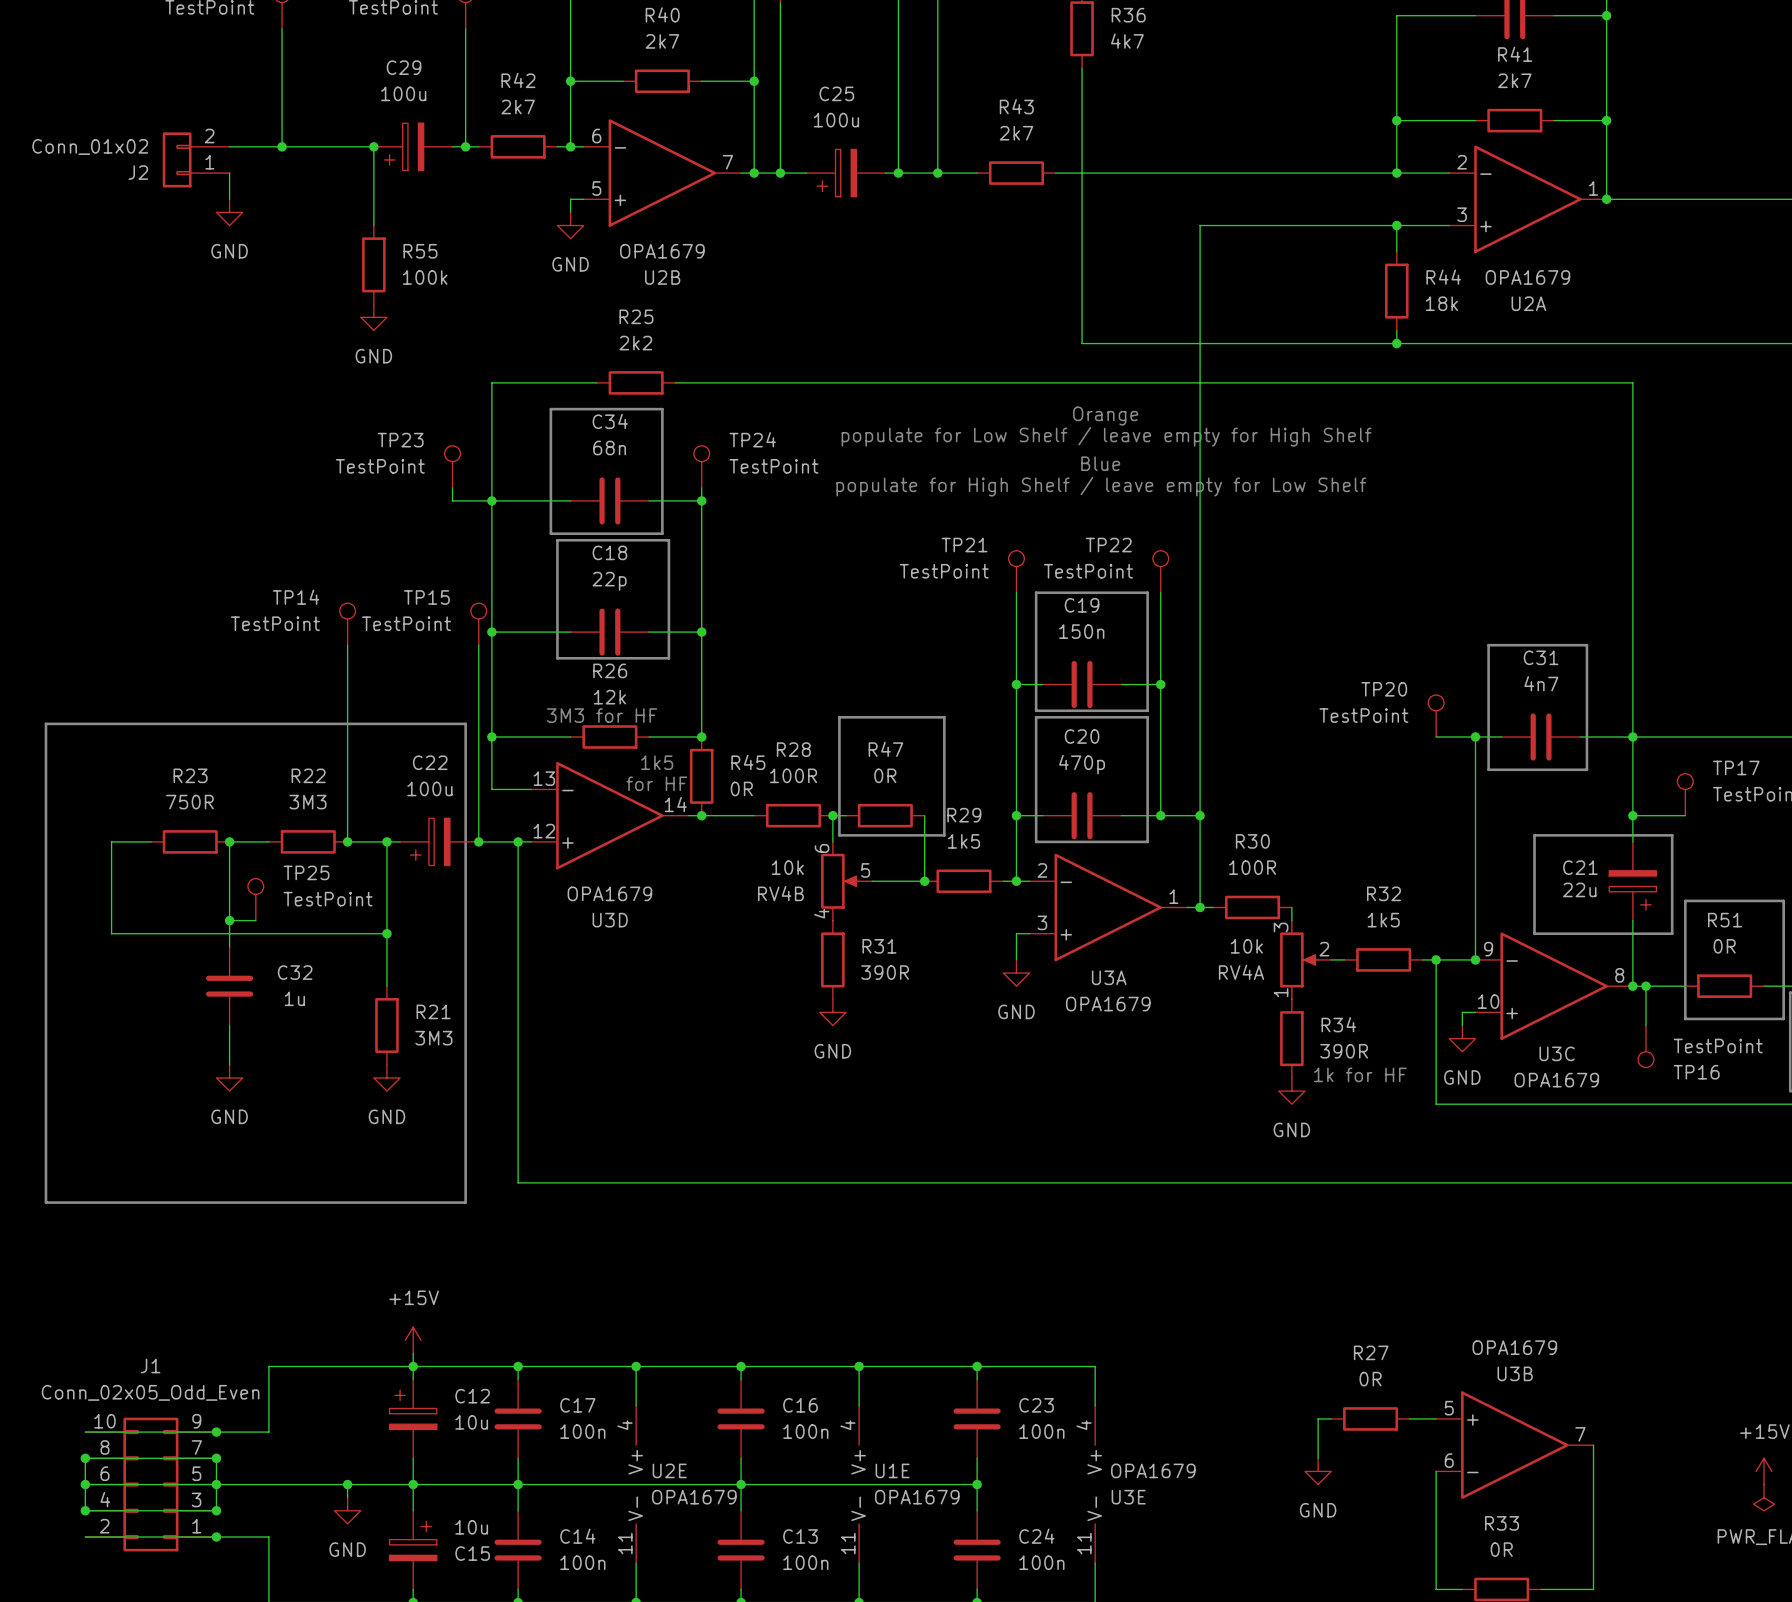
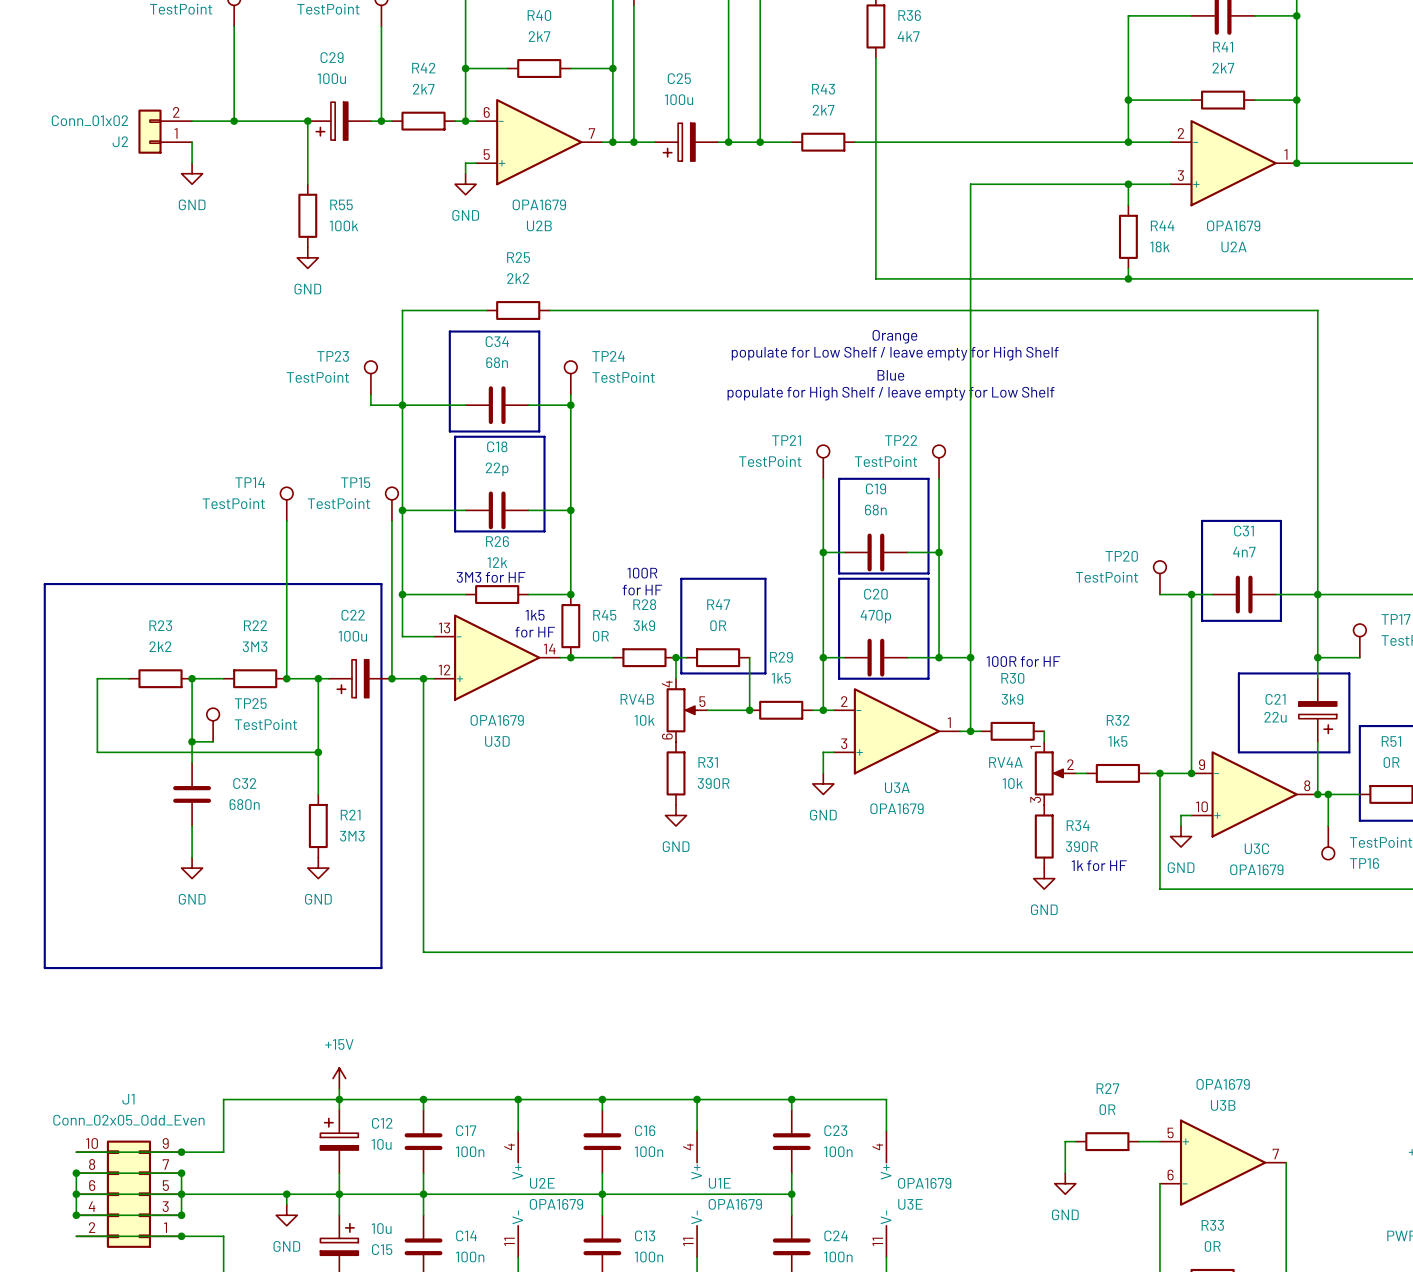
C19 value: 150n (1081, 631) -> 68n (875, 509)
text: none -> 100R (642, 573)
text: none -> for HF (642, 590)
R28 value: 100R (793, 775) -> 3k9 (644, 625)
R23 value: 750R (189, 802) -> 2k2 (160, 646)
text: none -> 100R for HF (1023, 661)
R30 value: 100R (1252, 867) -> 3k9 (1012, 699)
RV4B flip: as is (840, 881) -> up-down (681, 710)
RV4A flip: as is (1299, 959) -> up-down (1050, 773)
C32 value: 1u (294, 998) -> 680n (244, 804)

